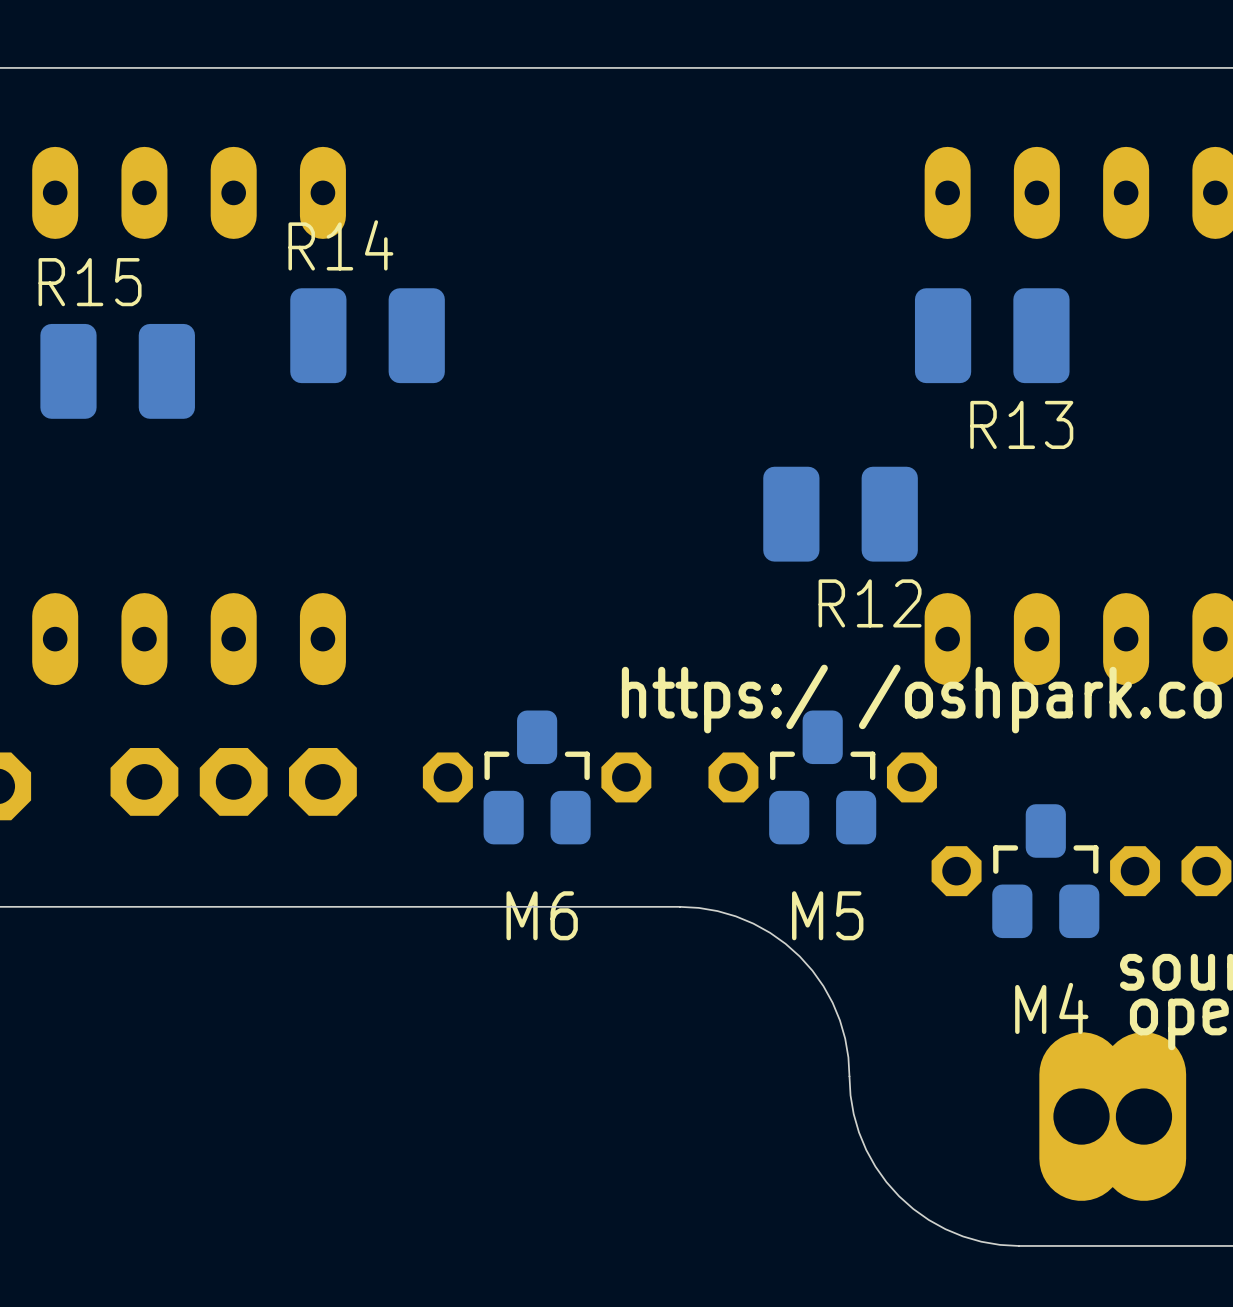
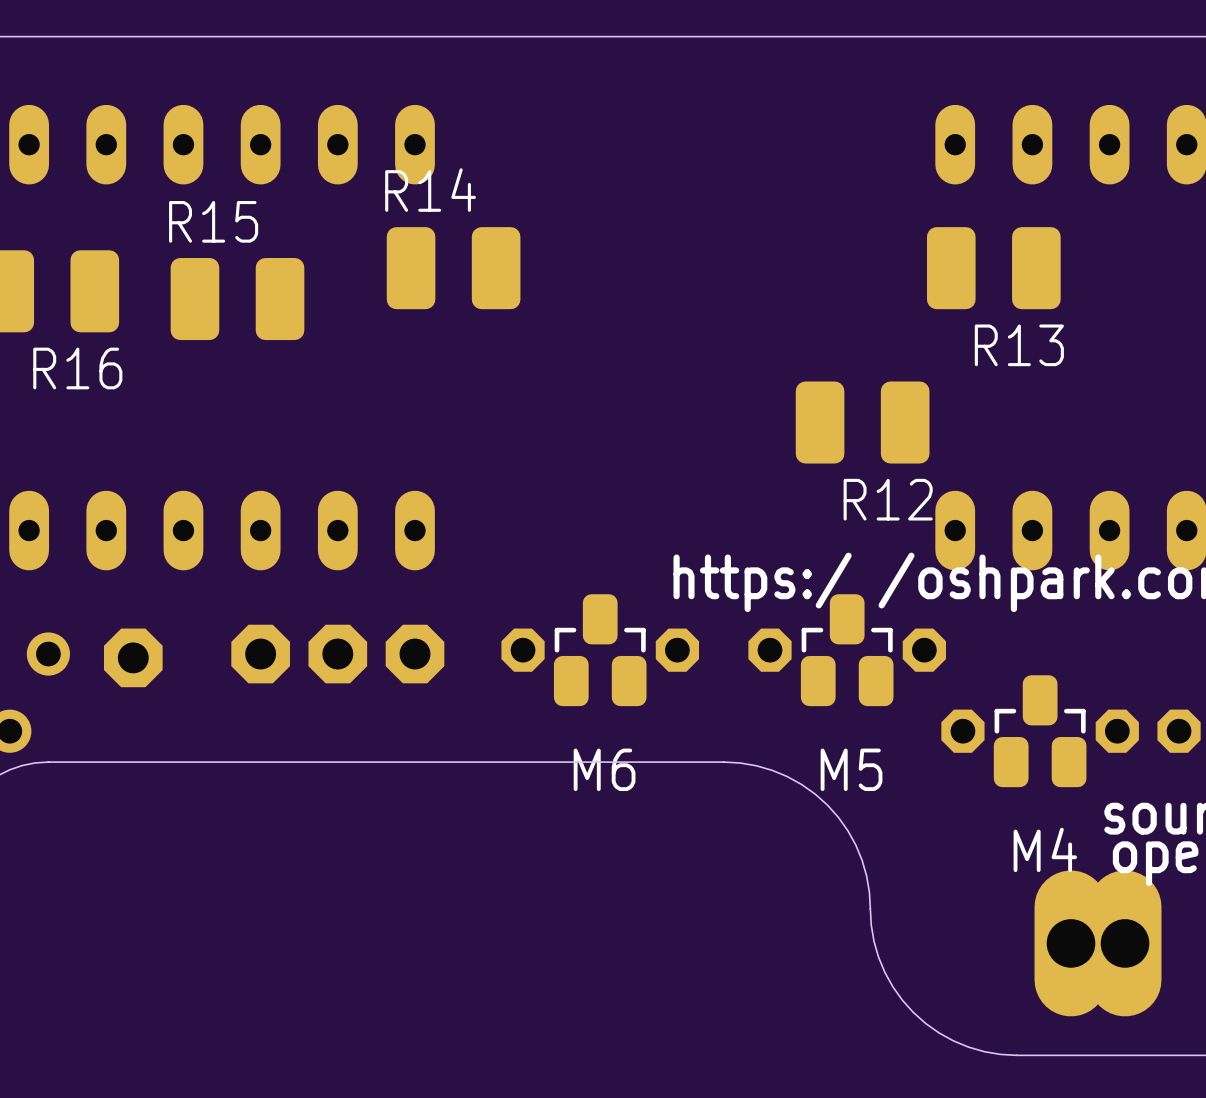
M6 footprint: [483, 710, 591, 845] -> [553, 594, 647, 707]
M5 footprint: [769, 710, 877, 845] -> [800, 594, 894, 707]
M4 footprint: [992, 804, 1100, 939] -> [993, 675, 1087, 788]

